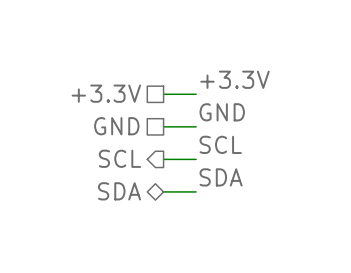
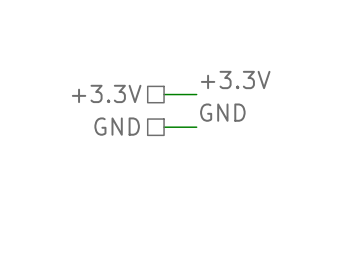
label: SCL (220, 144) -> none
hierarchical label: SCL (119, 158) -> none
wire: (163, 159) (196, 159) -> none
label: SDA (221, 177) -> none
hierarchical label: SDA (119, 191) -> none
wire: (163, 191) (196, 191) -> none

